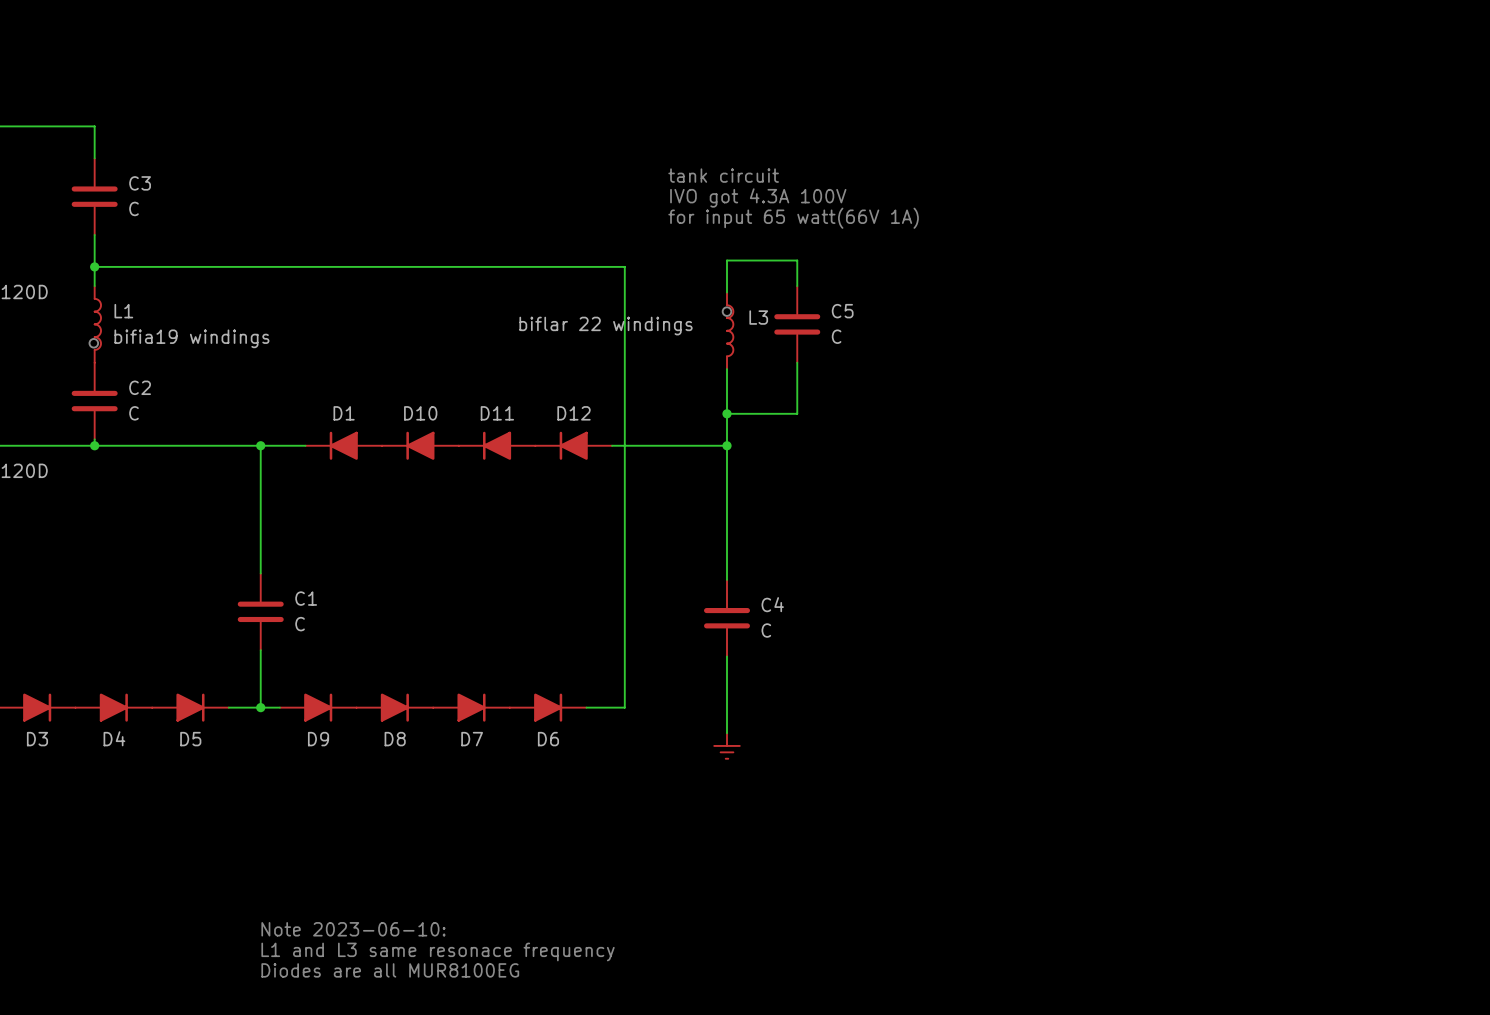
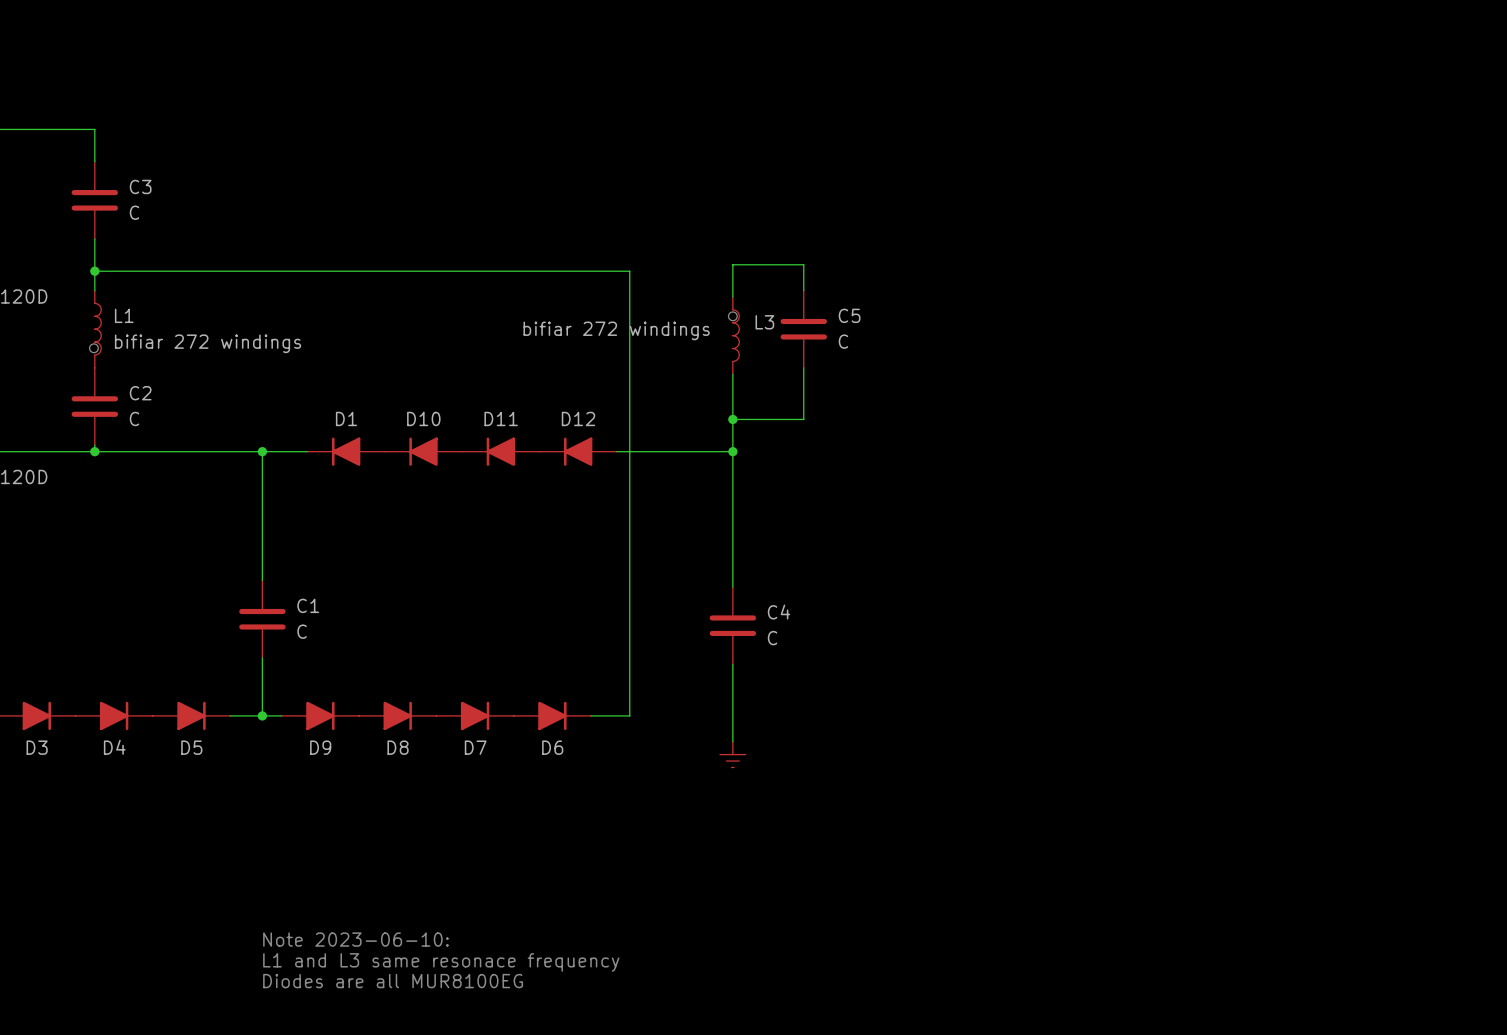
text: tank circuit (723, 175) -> none
text: IVO got 4.3A 100V (758, 197) -> none
text: for input 65 watt(66V 1A) (793, 218) -> none
L3 value: biflar 22 windings (606, 326) -> bifiar 272 windings (616, 330)
L1 value: bifia19 windings (191, 338) -> bifiar 272 windings (208, 343)

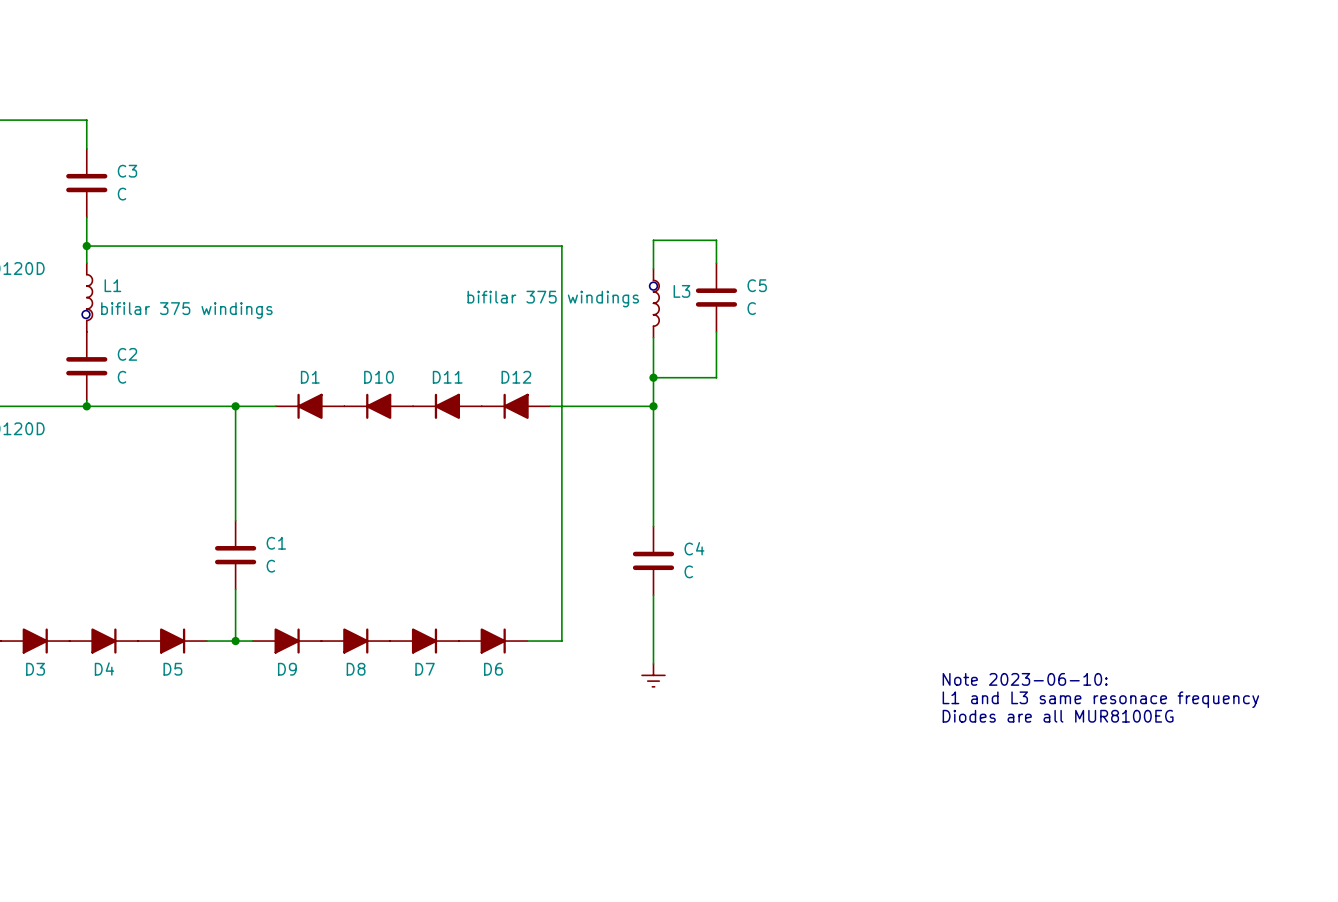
L3 value: bifiar 272 windings (616, 330) -> bifilar 375 windings (553, 299)
L1 value: bifiar 272 windings (208, 343) -> bifilar 375 windings (186, 310)
text: none -> Note 2023-06-10: (1025, 679)
text: none -> L1 and L3 same resonace frequency (1100, 699)
text: none -> Diodes are all MUR8100EG (1058, 716)
text: Note 2023-06-10: (355, 939) -> none
text: L1 and L3 same resonace frequency (441, 962) -> none
text: Diodes are all MUR8100EG (393, 981) -> none

